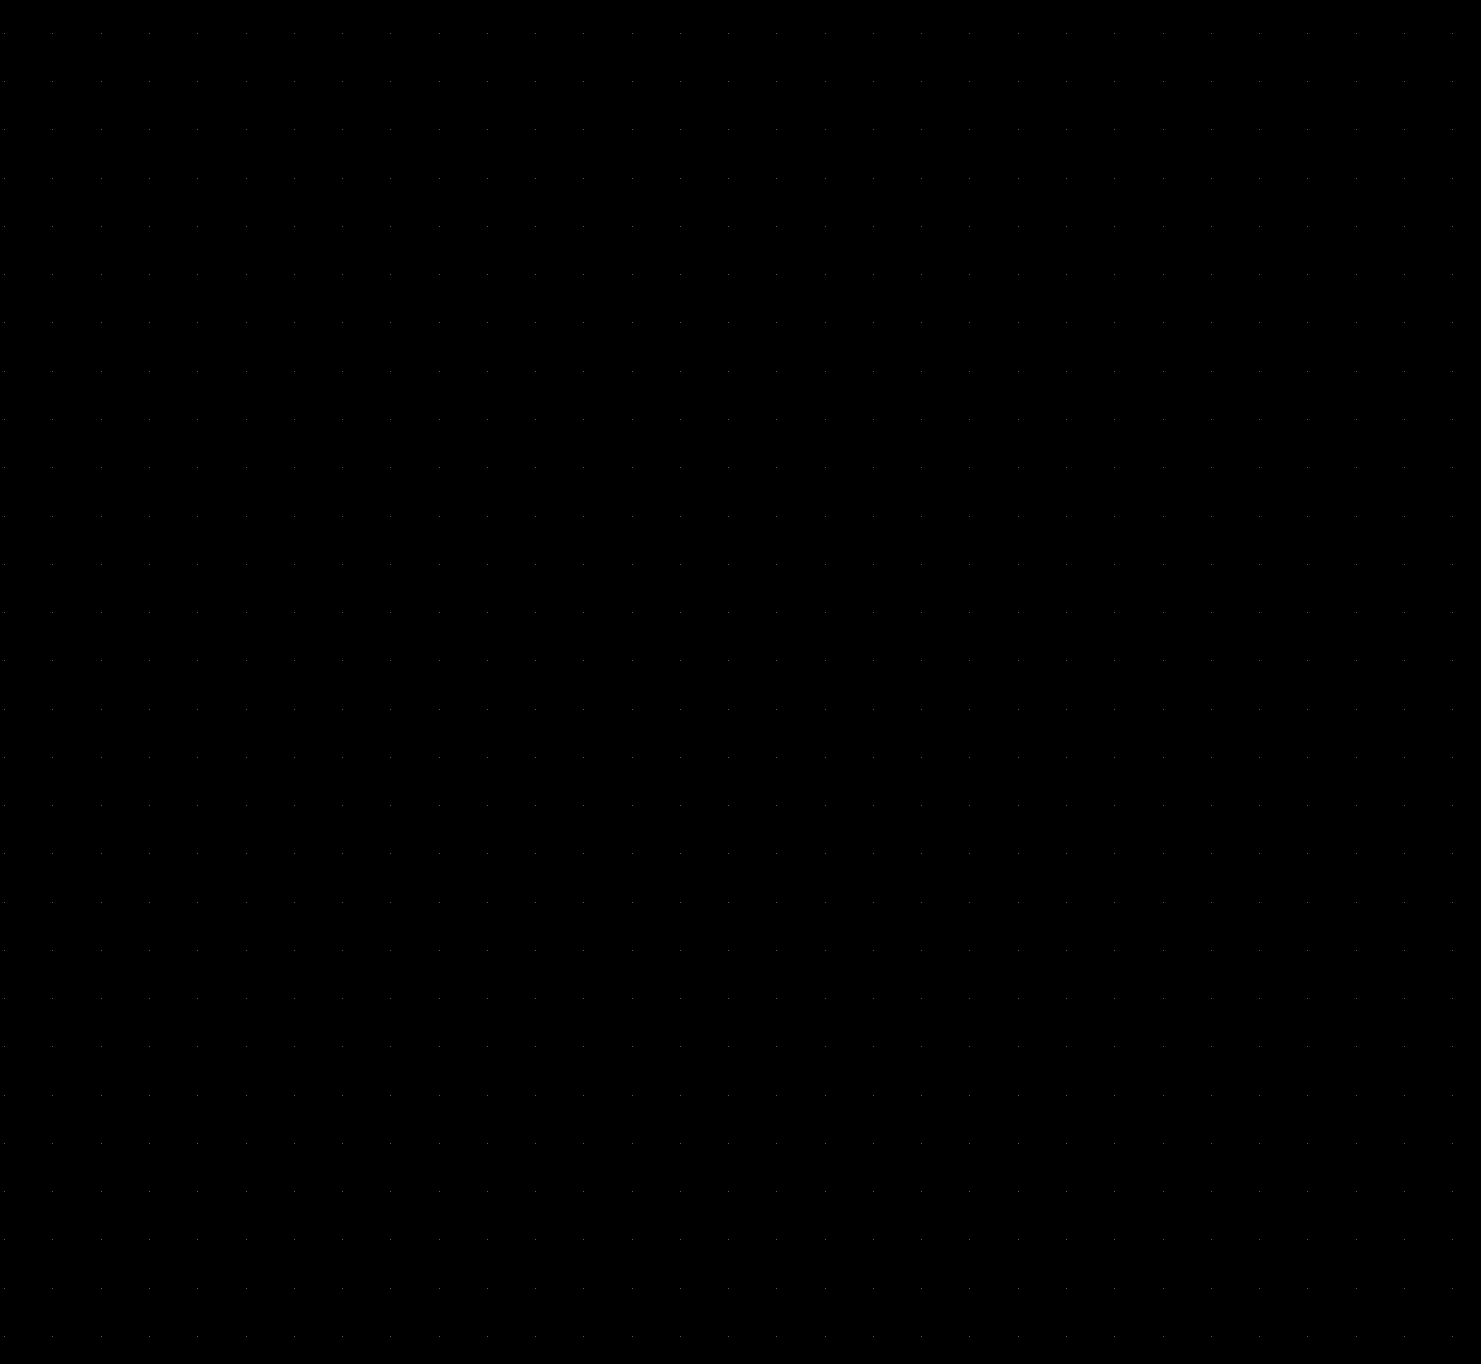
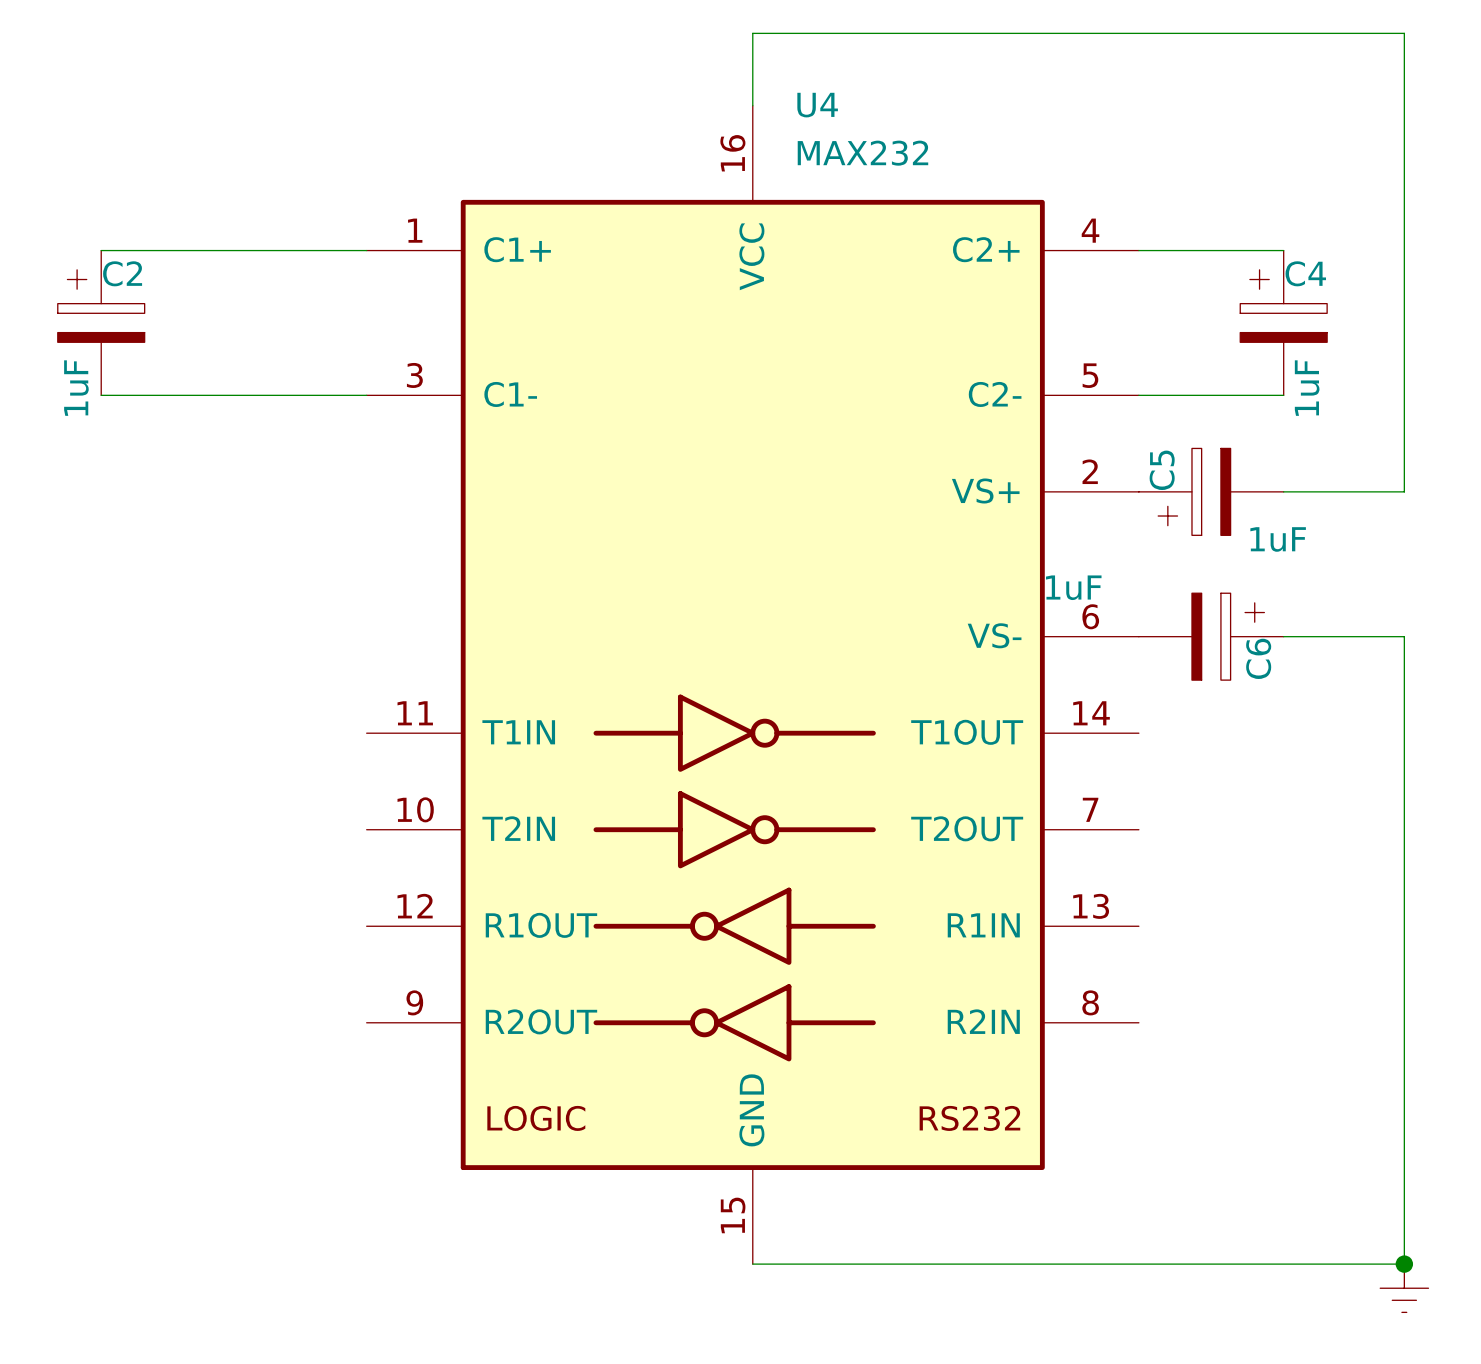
wire: none -> (752, 105) (752, 33) (1404, 33) (1404, 491) (1283, 491)
wire: none -> (101, 250) (366, 250)
wire: none -> (1138, 250) (1283, 250)
C2: none -> 1uF (101, 322)
C4: none -> 1uF (1283, 322)
wire: none -> (101, 395) (366, 395)
wire: none -> (1138, 395) (1283, 395)
C5: none -> 1uF (1211, 491)
C6: none -> 1uF (1211, 636)
wire: none -> (1283, 636) (1404, 636) (1404, 1264) (752, 1264)
U4: none -> MAX232 (752, 684)
junction: none -> (1404, 1264)
power symbol: none -> (1404, 1288)

